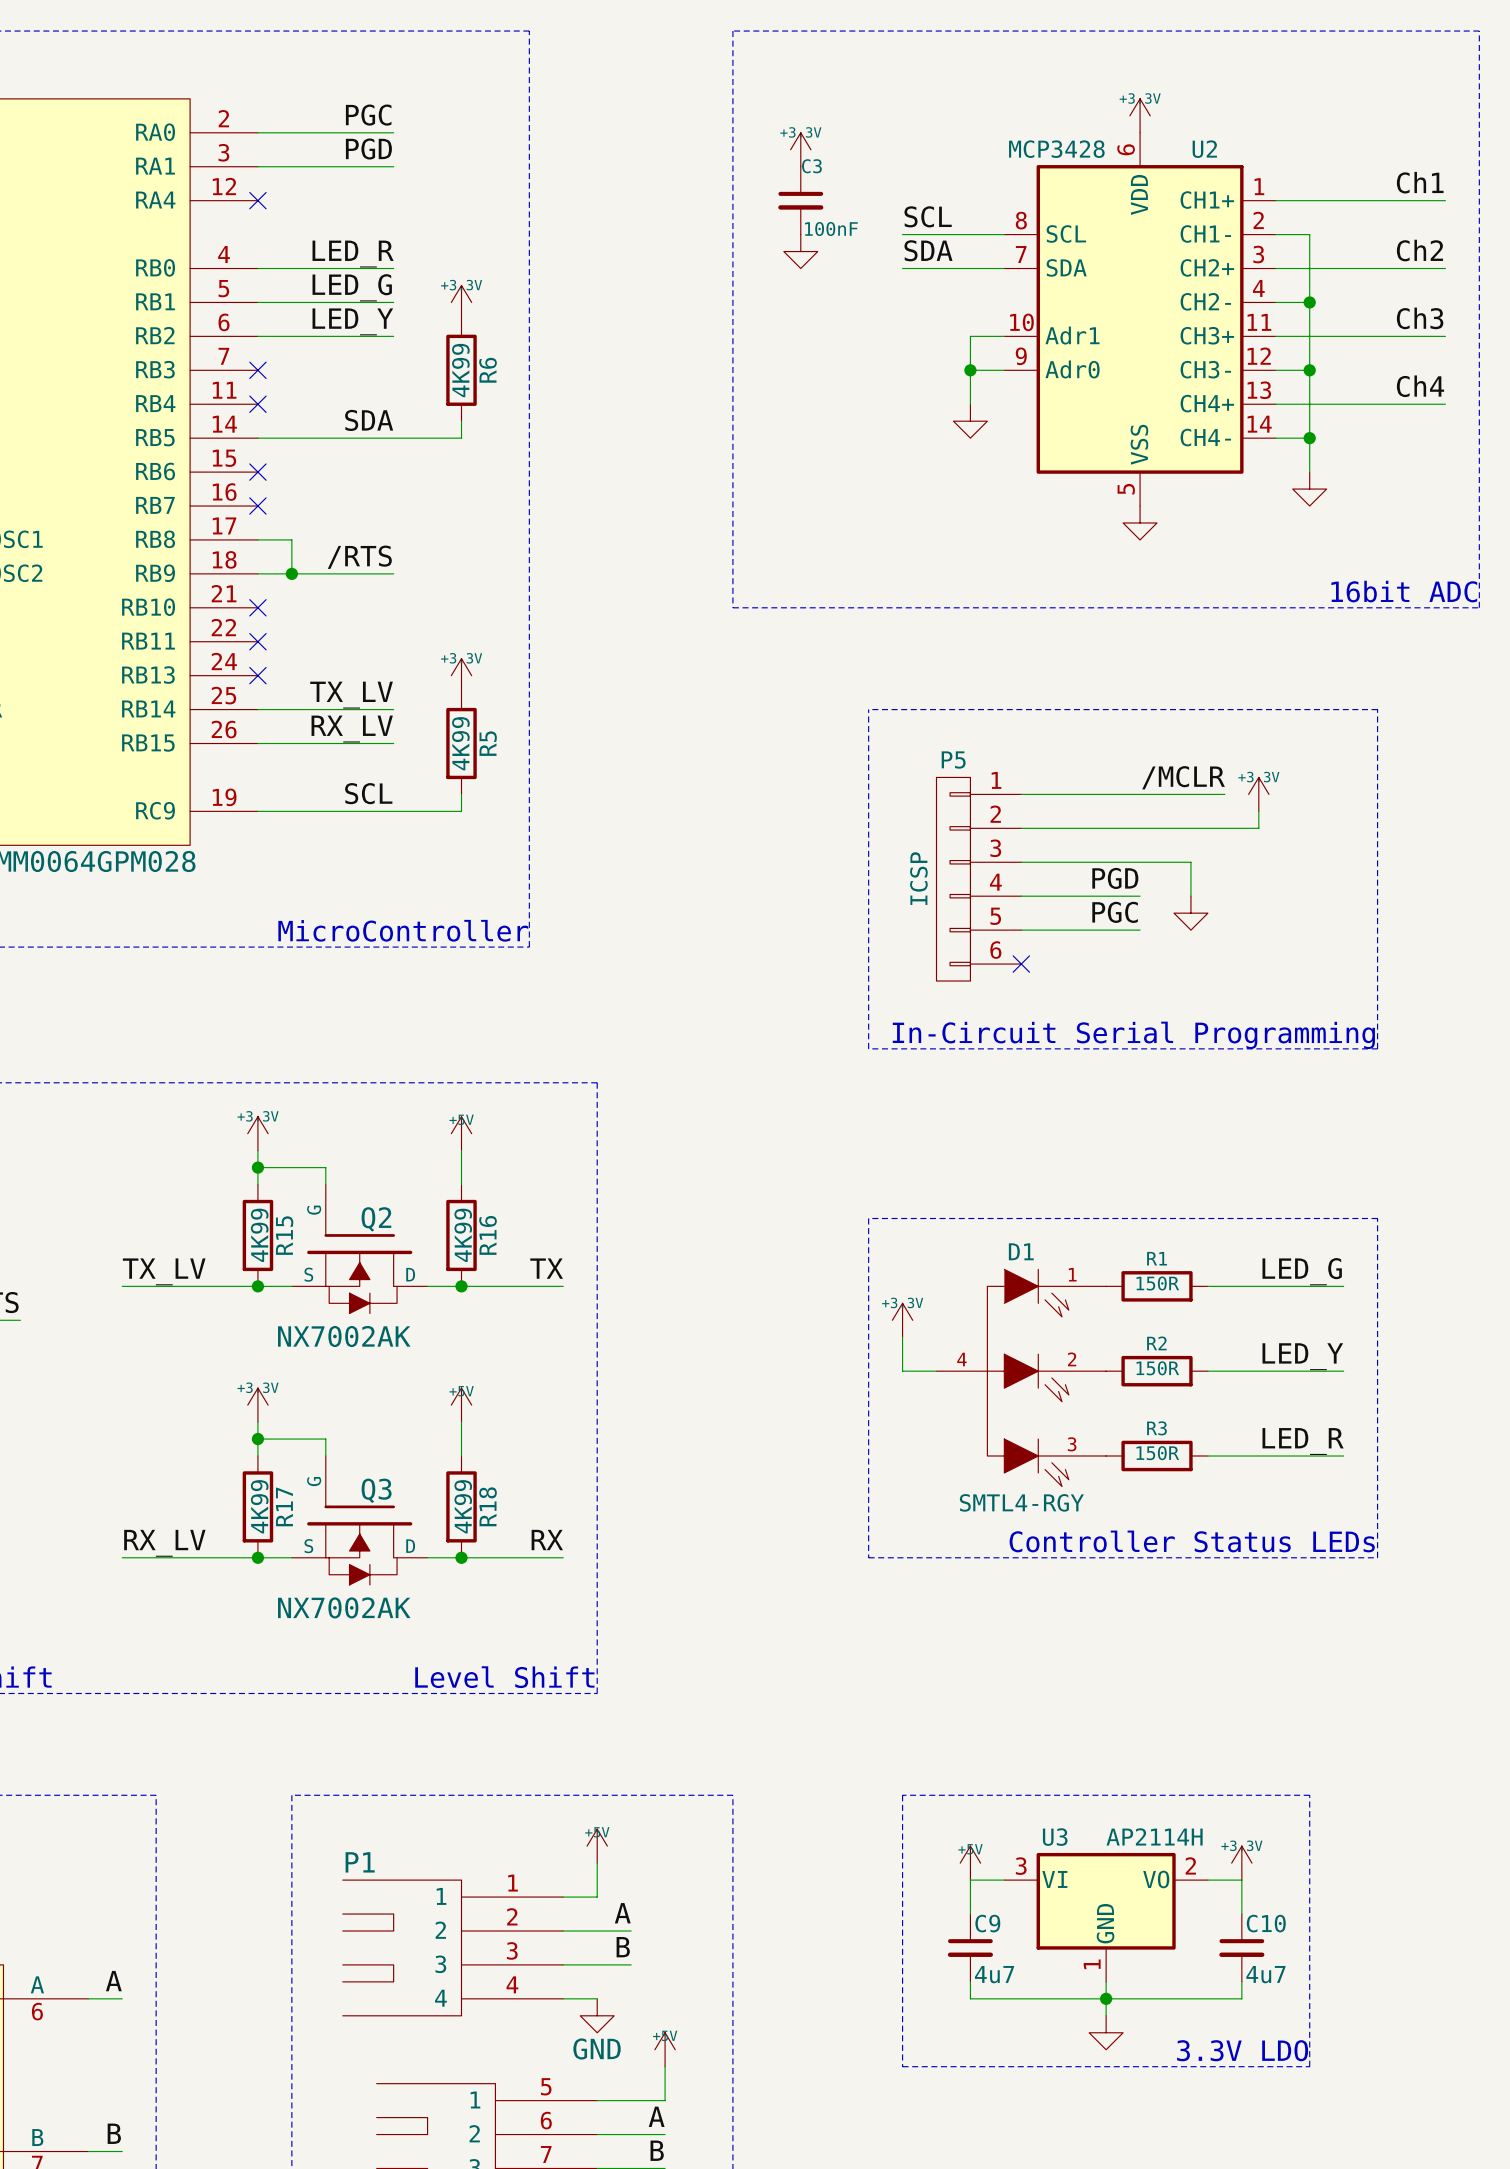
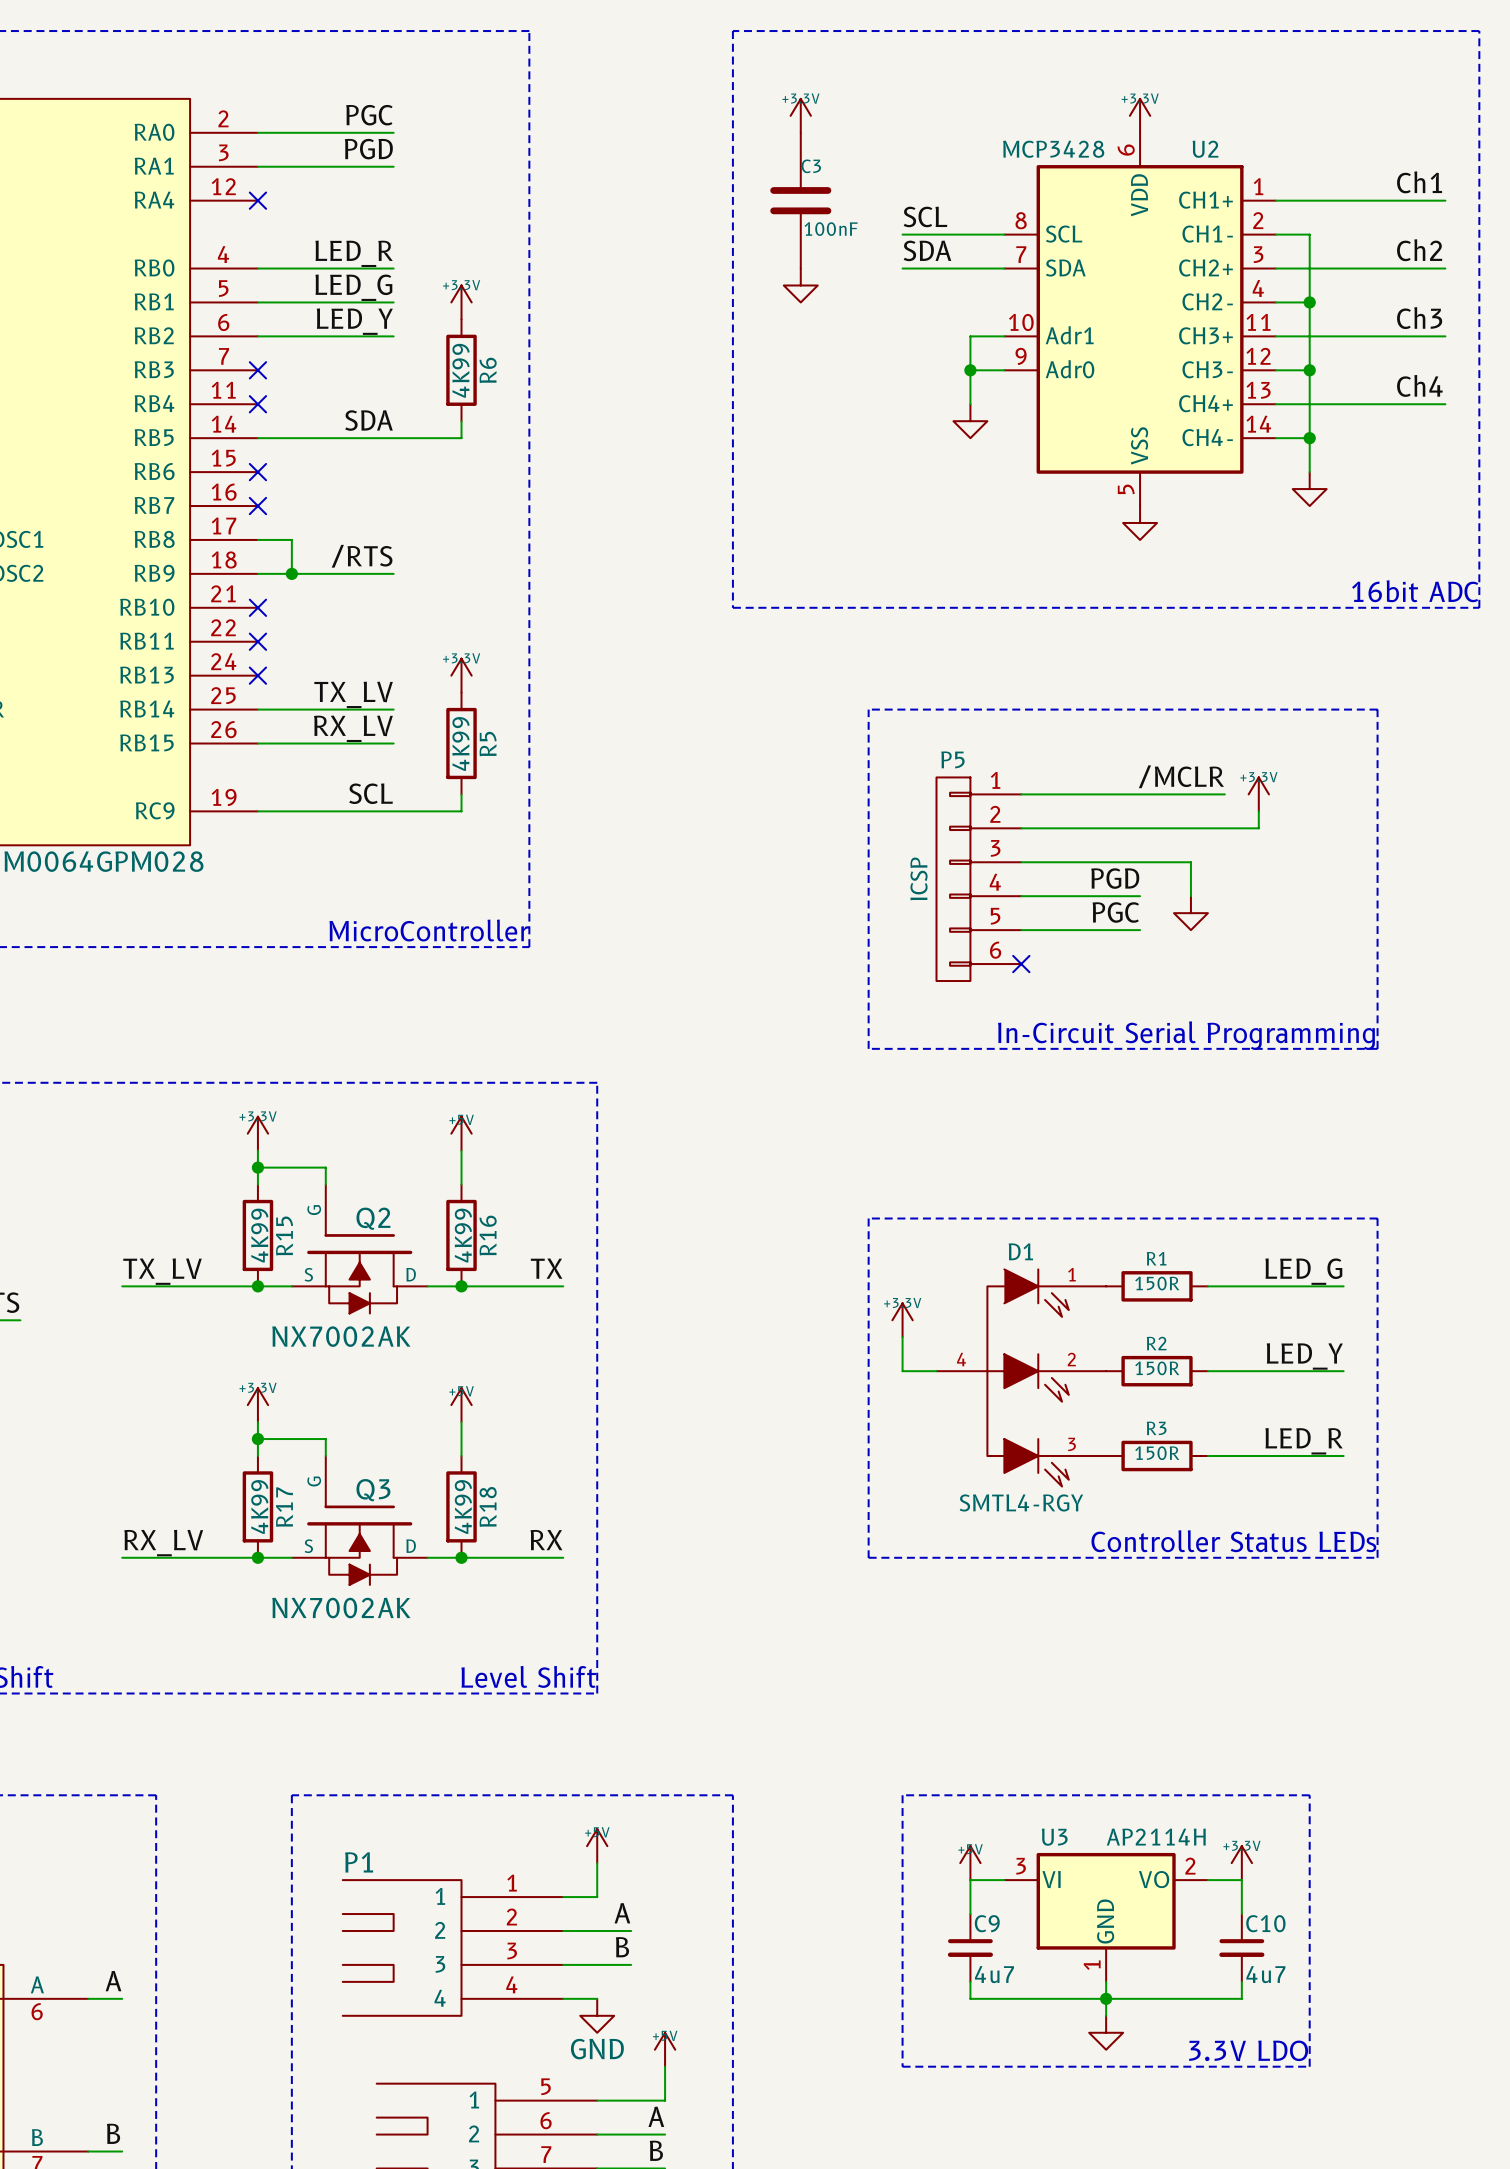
power symbol position: +3.3V (800, 149) -> +3.3V (800, 115)
C3 symbol: [778, 166, 824, 235] -> [770, 132, 832, 269]
power symbol position: (800, 251) -> (800, 285)

